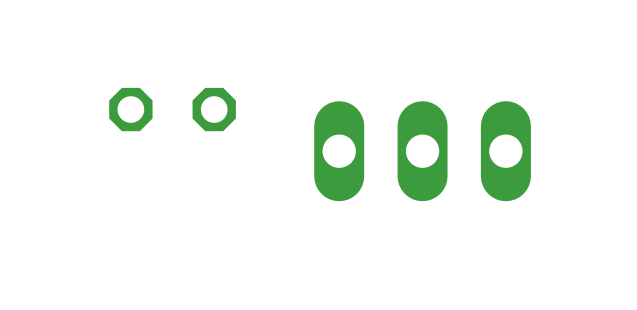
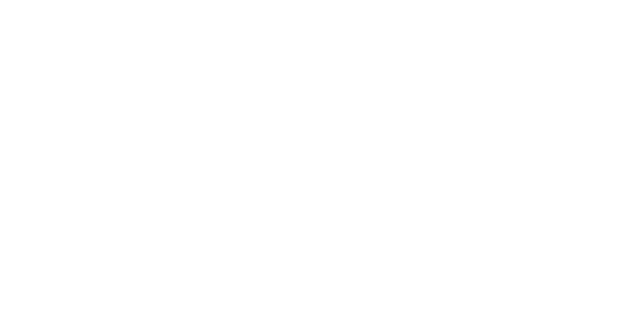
part: (172, 109) -> none
part: (422, 151) -> none

